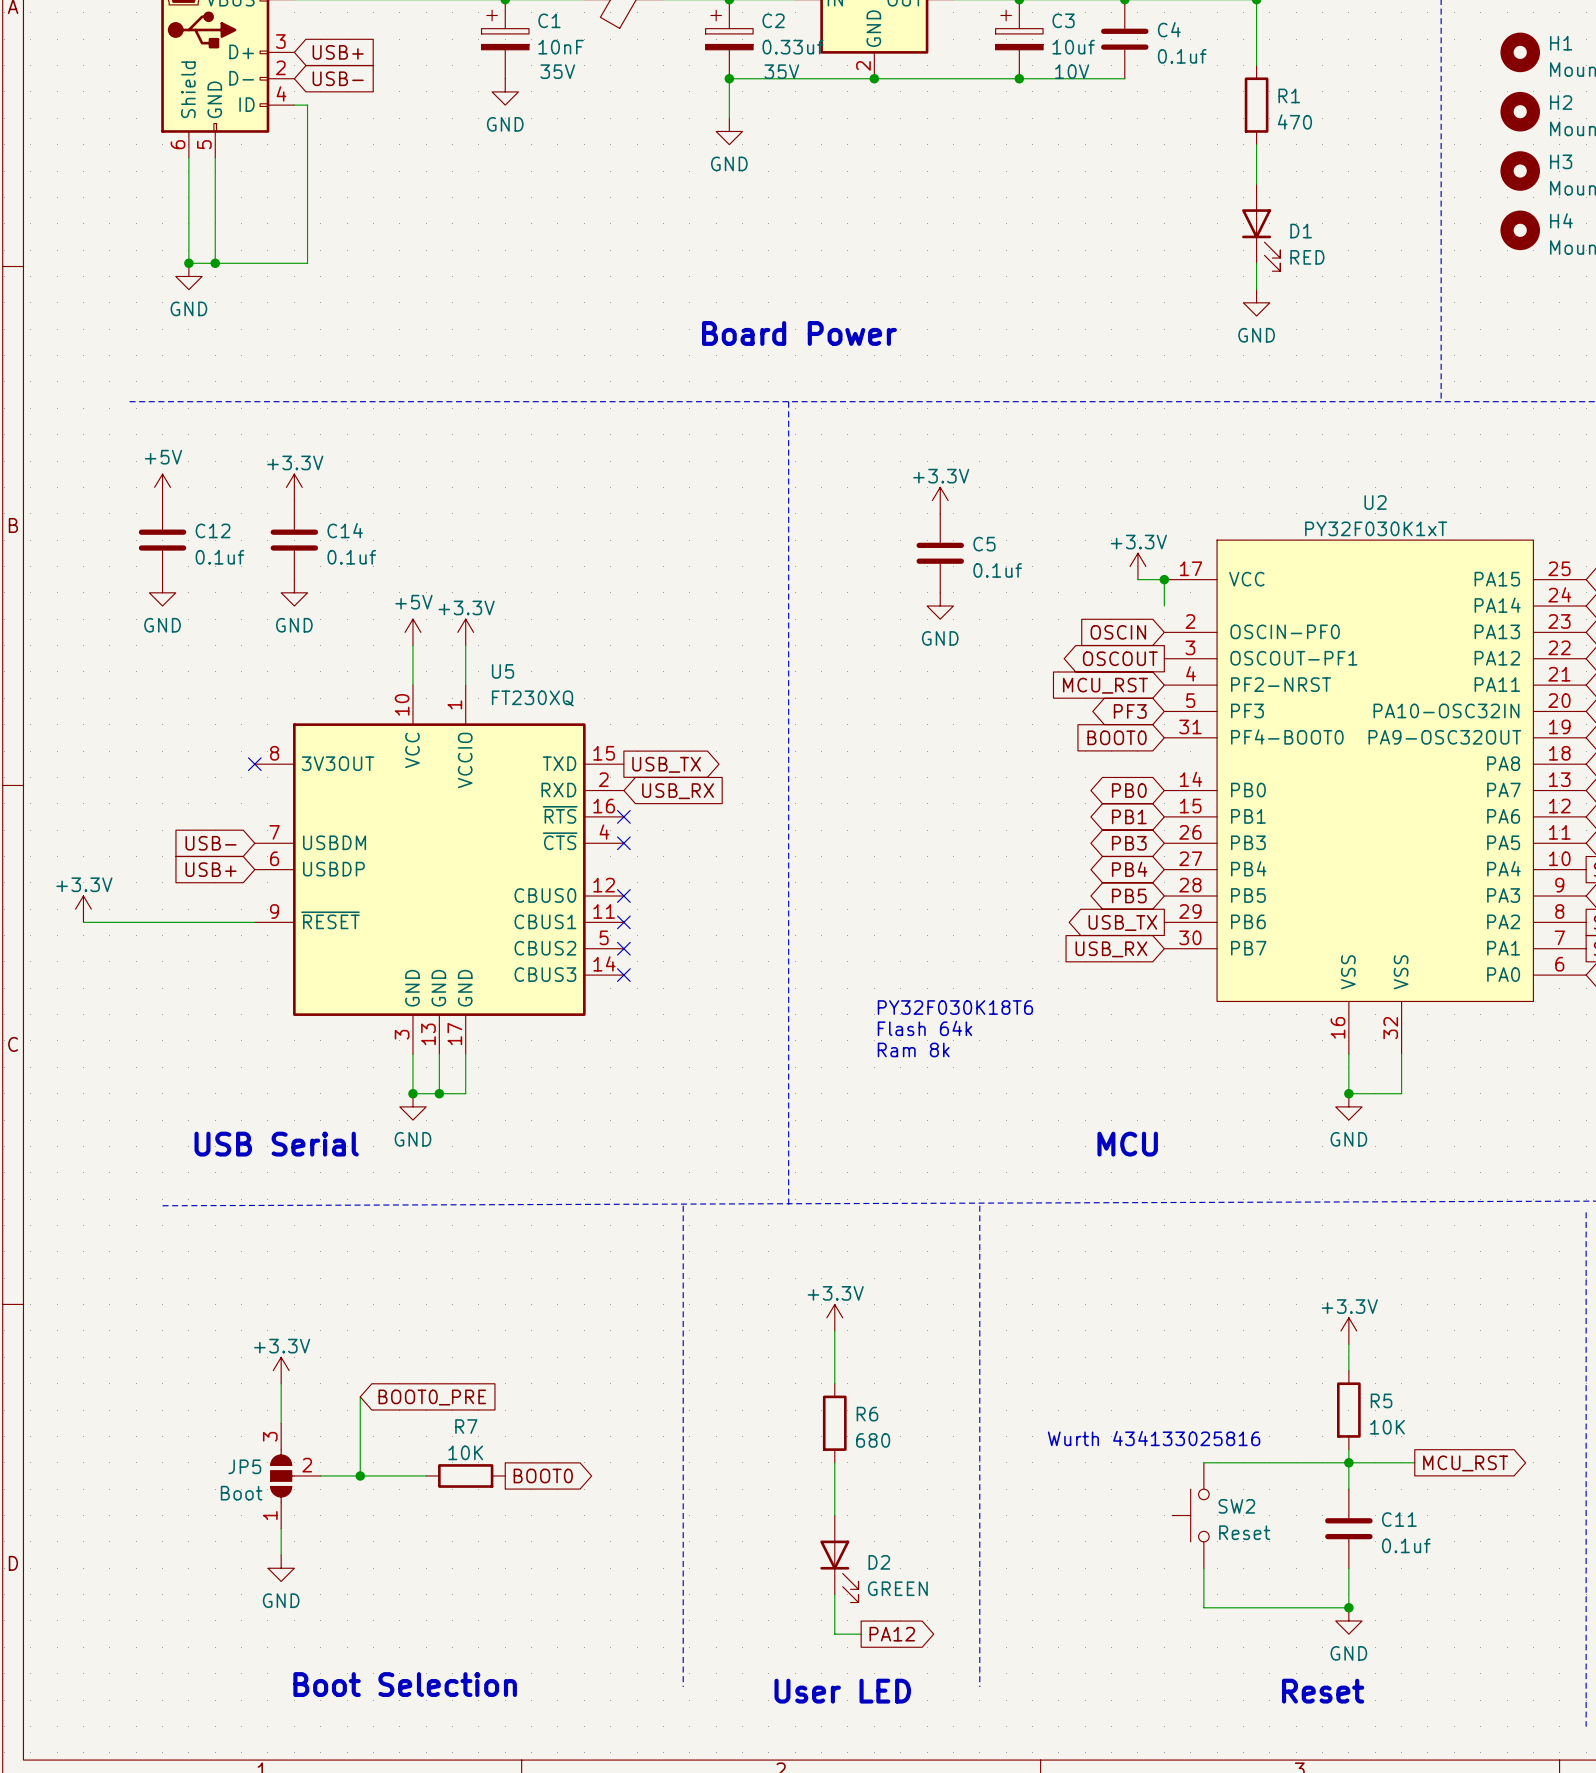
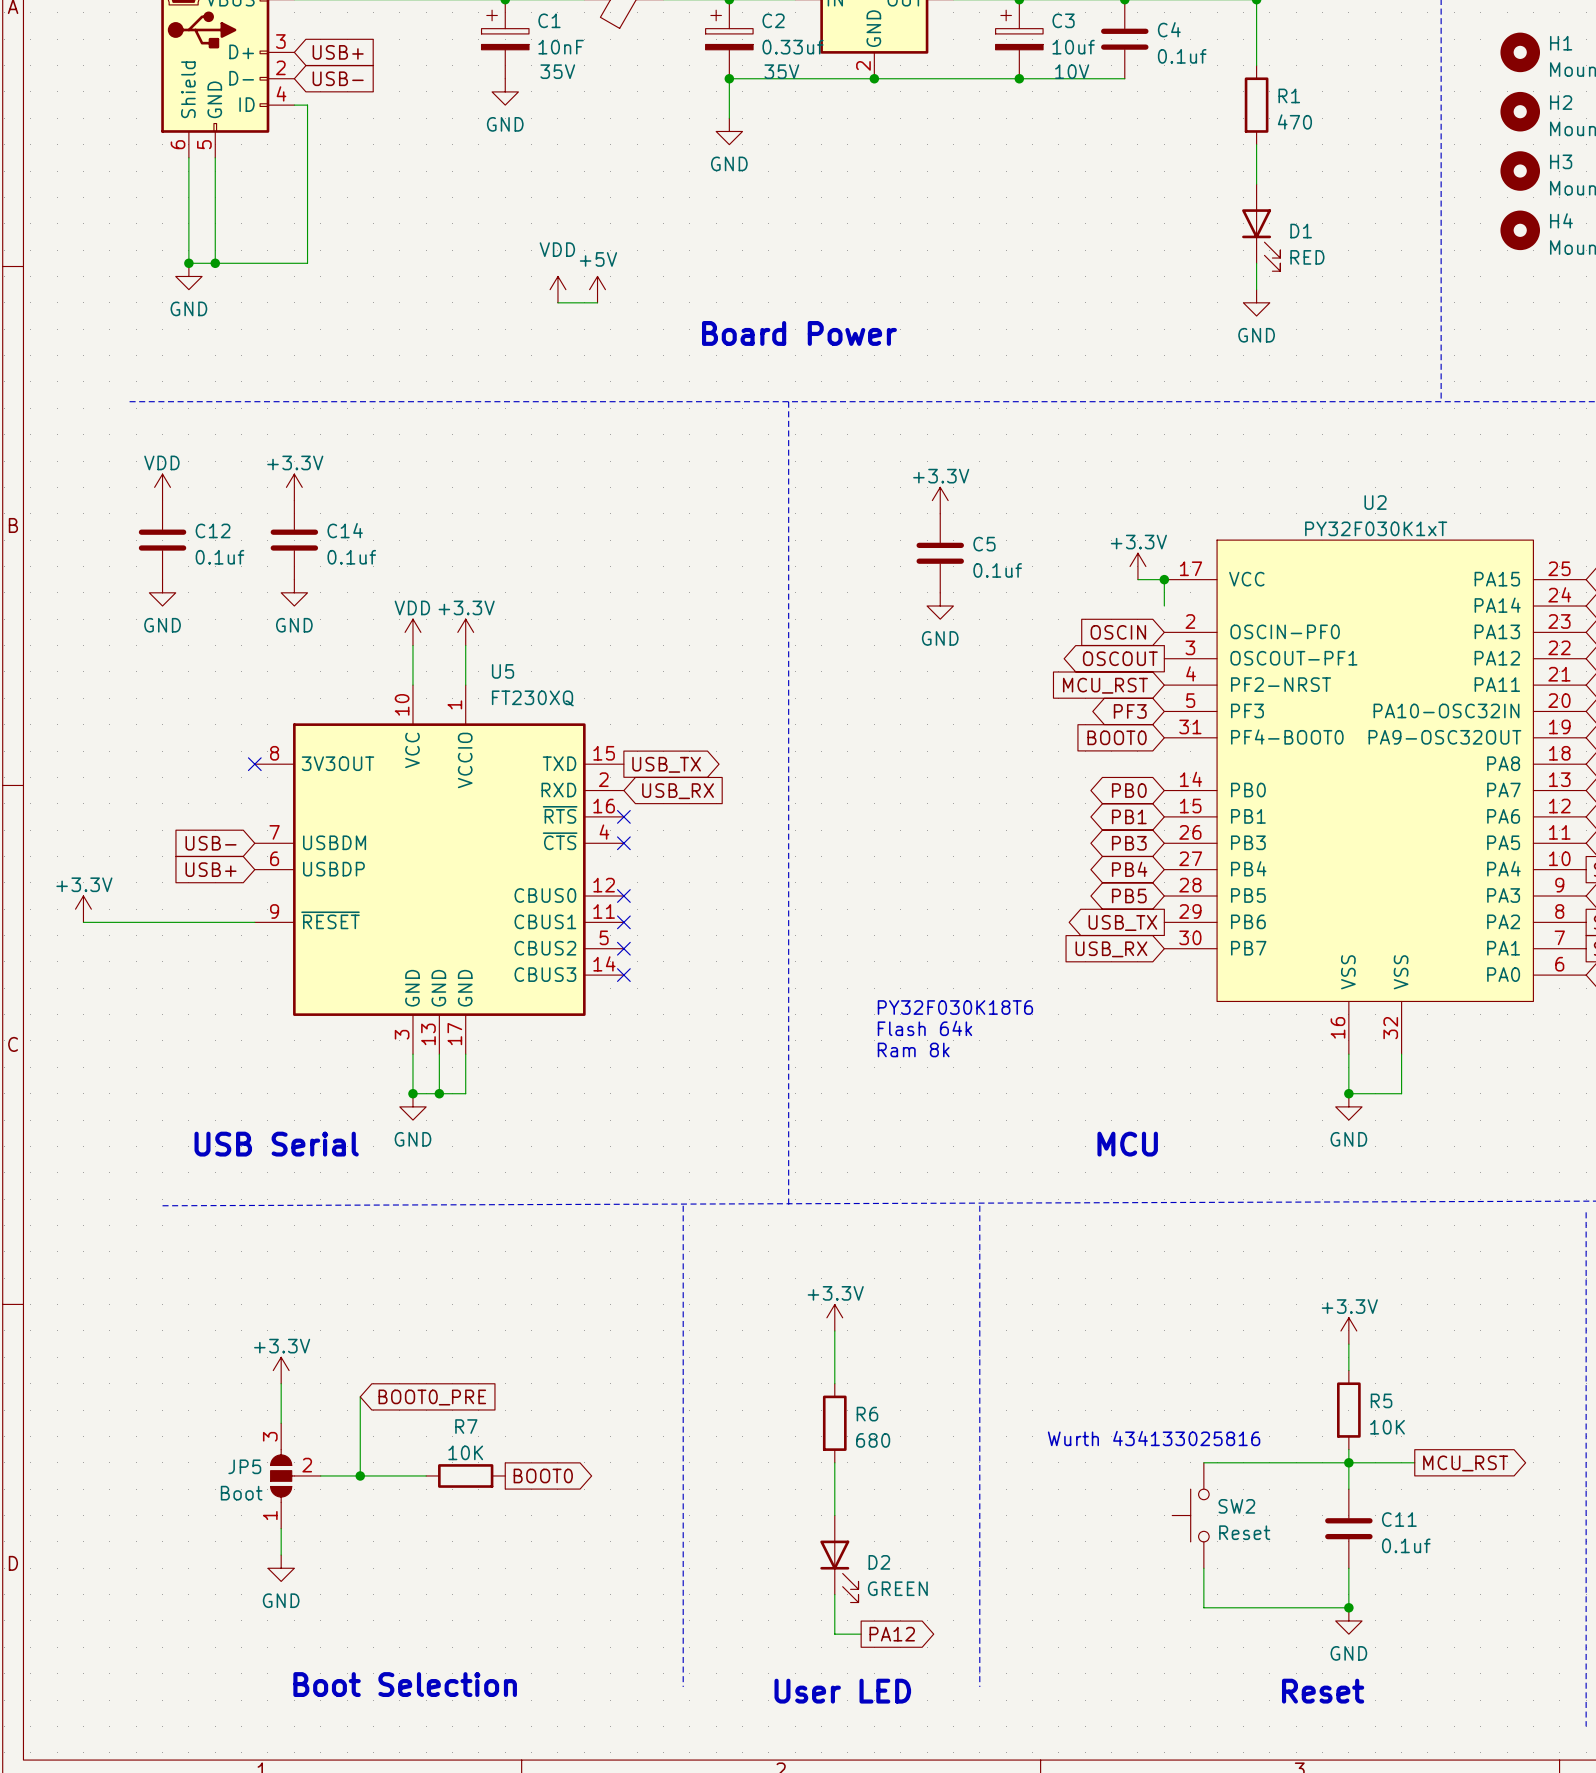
power symbol: none -> VDD (557, 289)
power symbol: none -> +5V (597, 289)
wire: none -> (557, 302) (597, 302)
power symbol: +5V (162, 487) -> VDD (162, 487)
power symbol: +5V (412, 632) -> VDD (412, 632)

